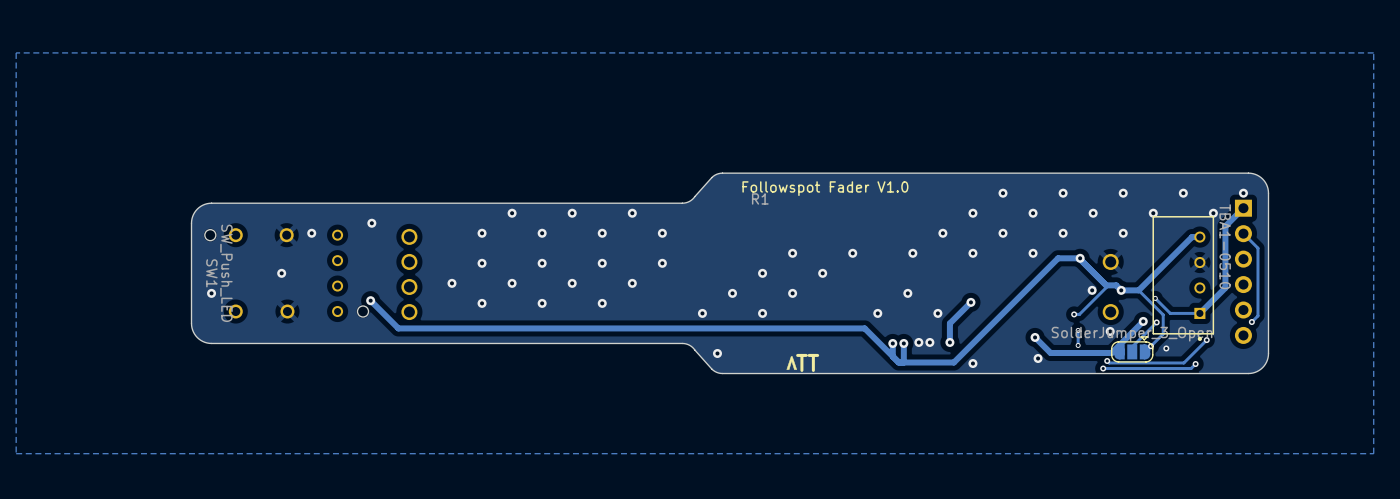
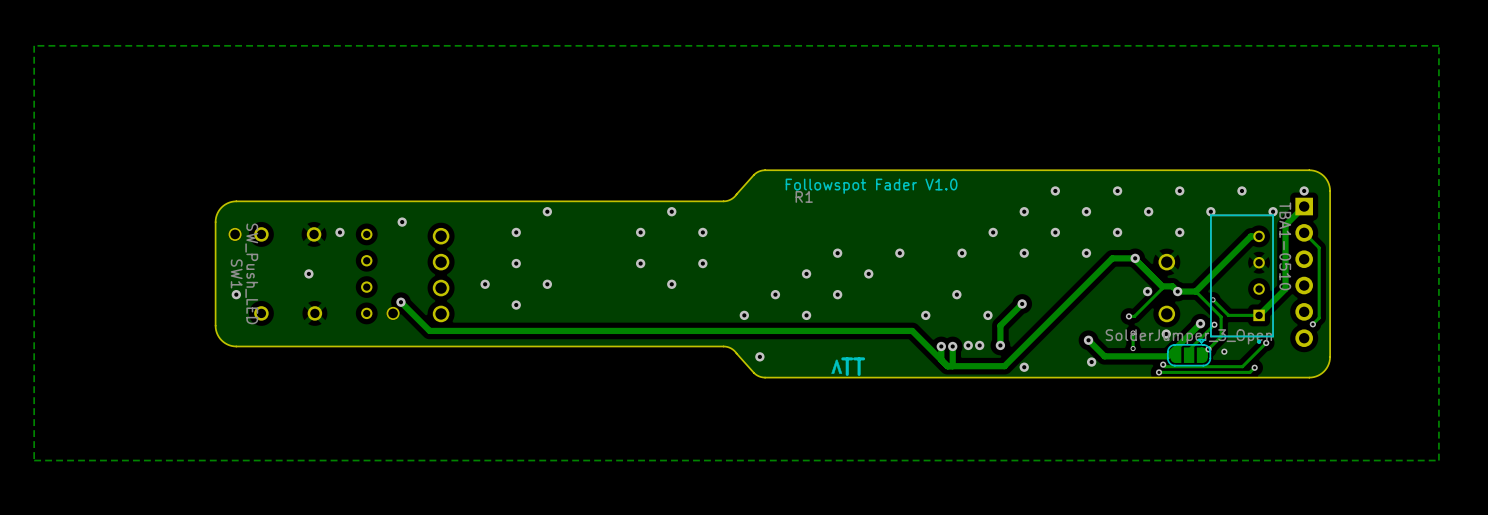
via: (572, 213) -> none
via: (542, 233) -> none
via: (542, 263) -> none
via: (572, 283) -> none
via: (542, 303) -> none
via: (602, 303) -> none

